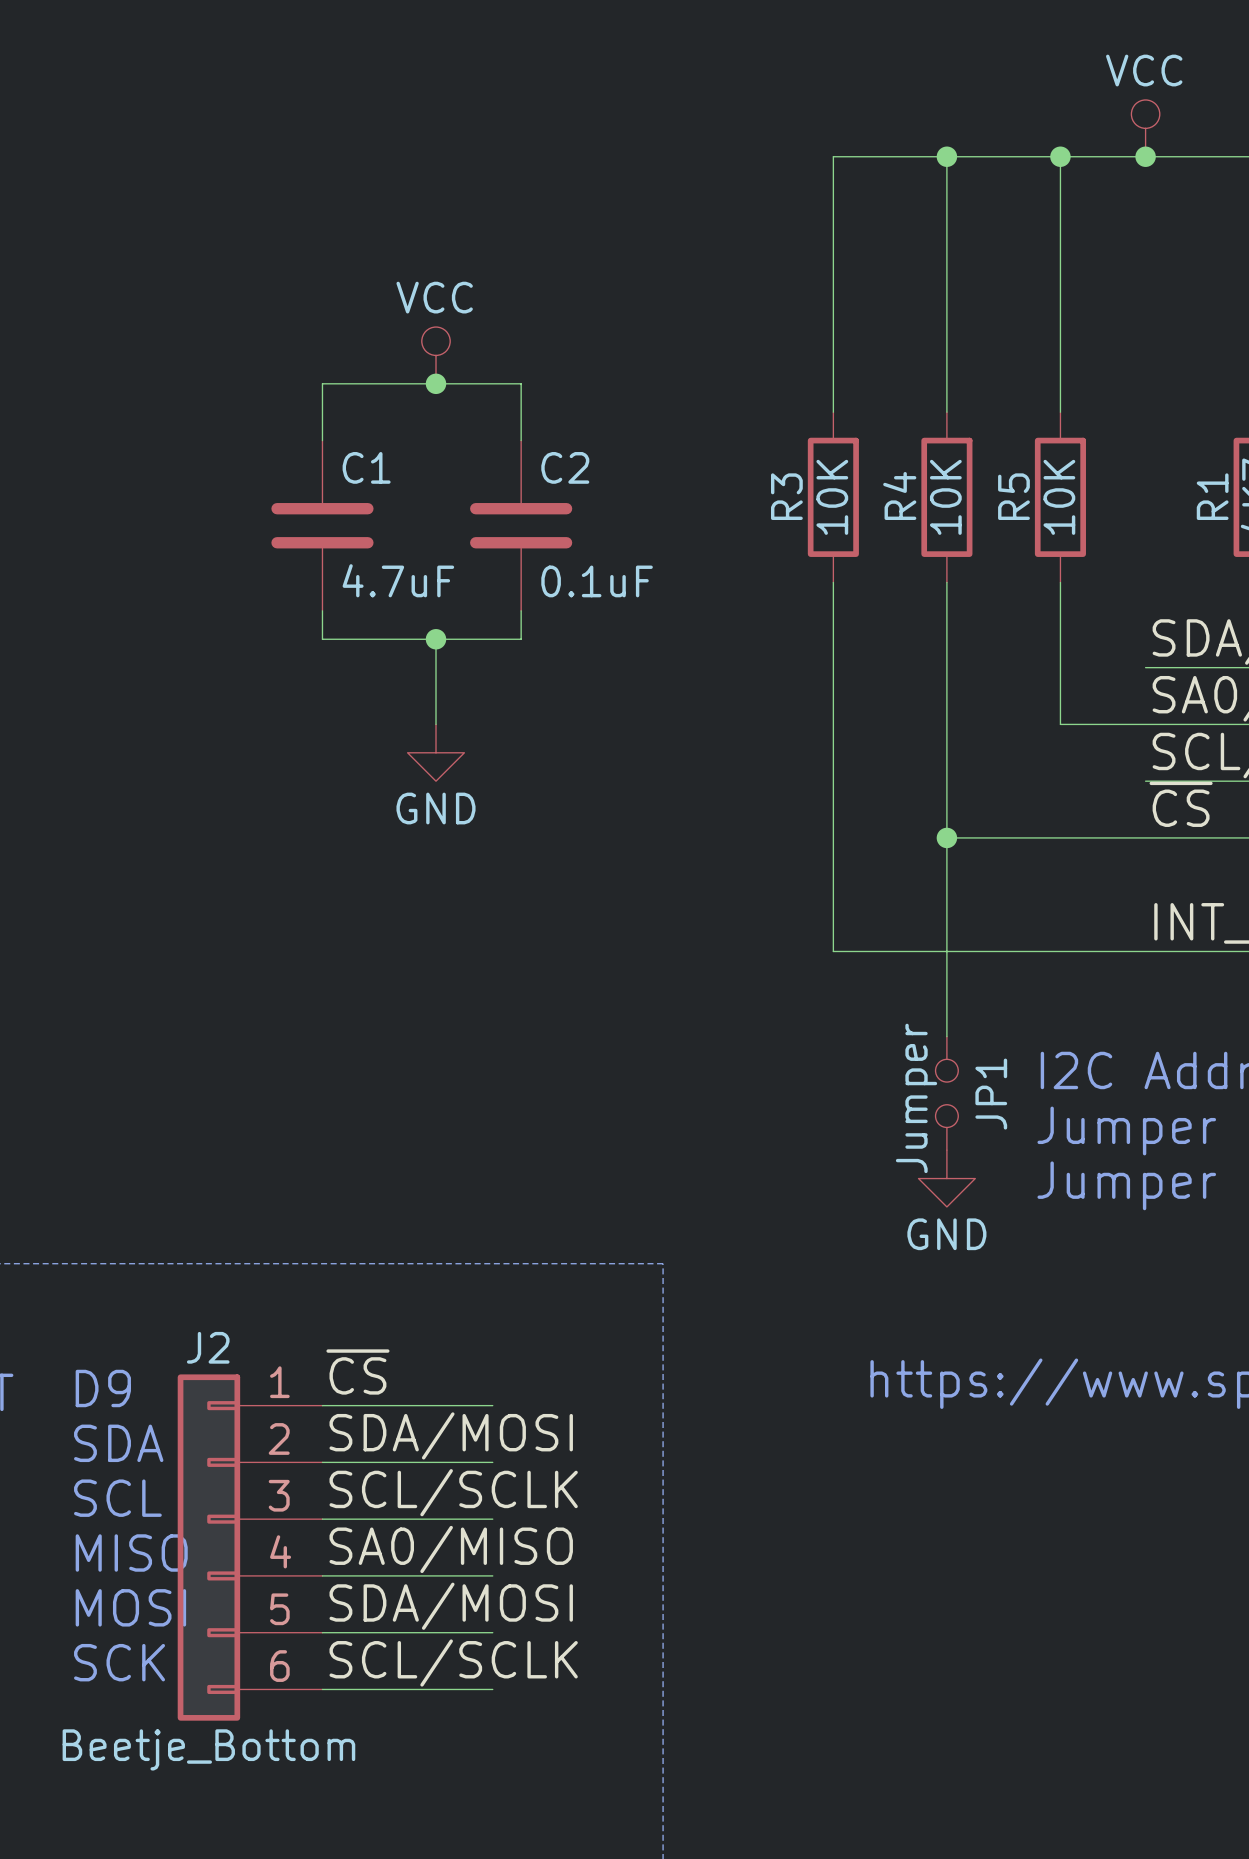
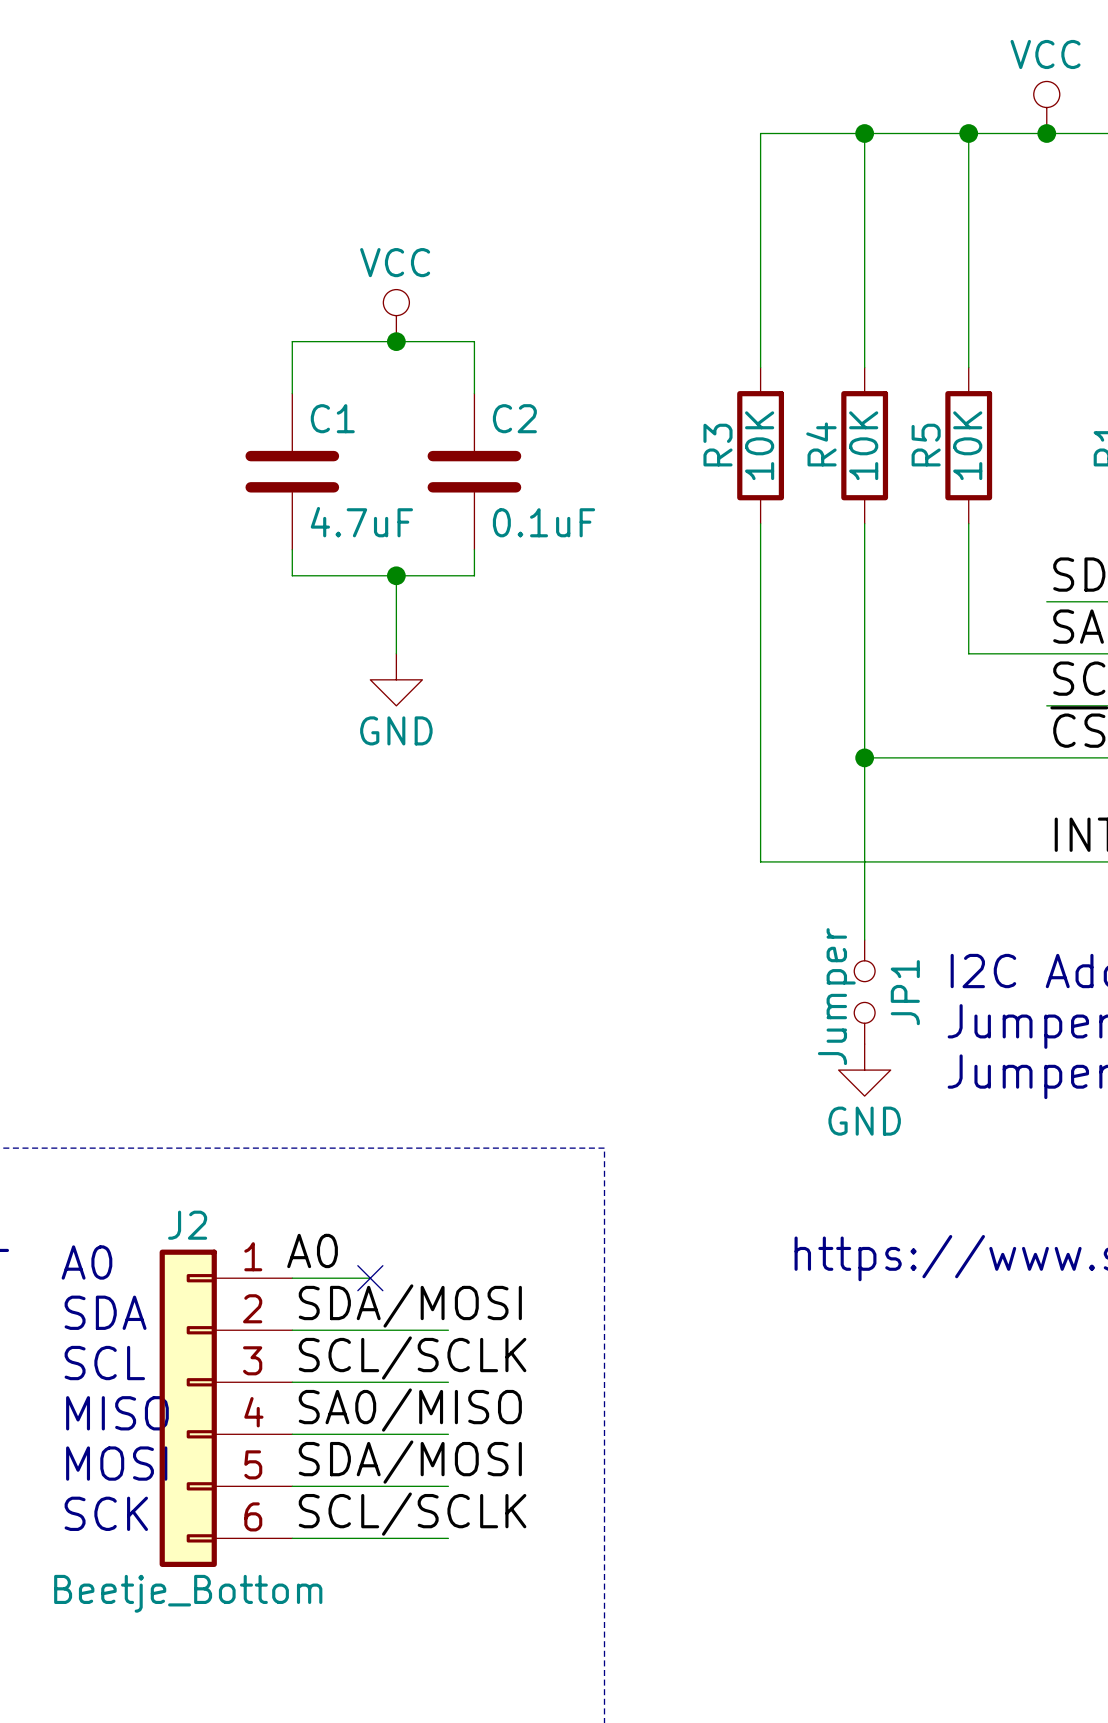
label: ~{CS} (357, 1371) -> none
label: none -> A0 (312, 1250)
text: D9 (103, 1388) -> A0 (86, 1262)
wire: (407, 1405) (492, 1405) -> none
no-connect mark: none -> (370, 1278)

